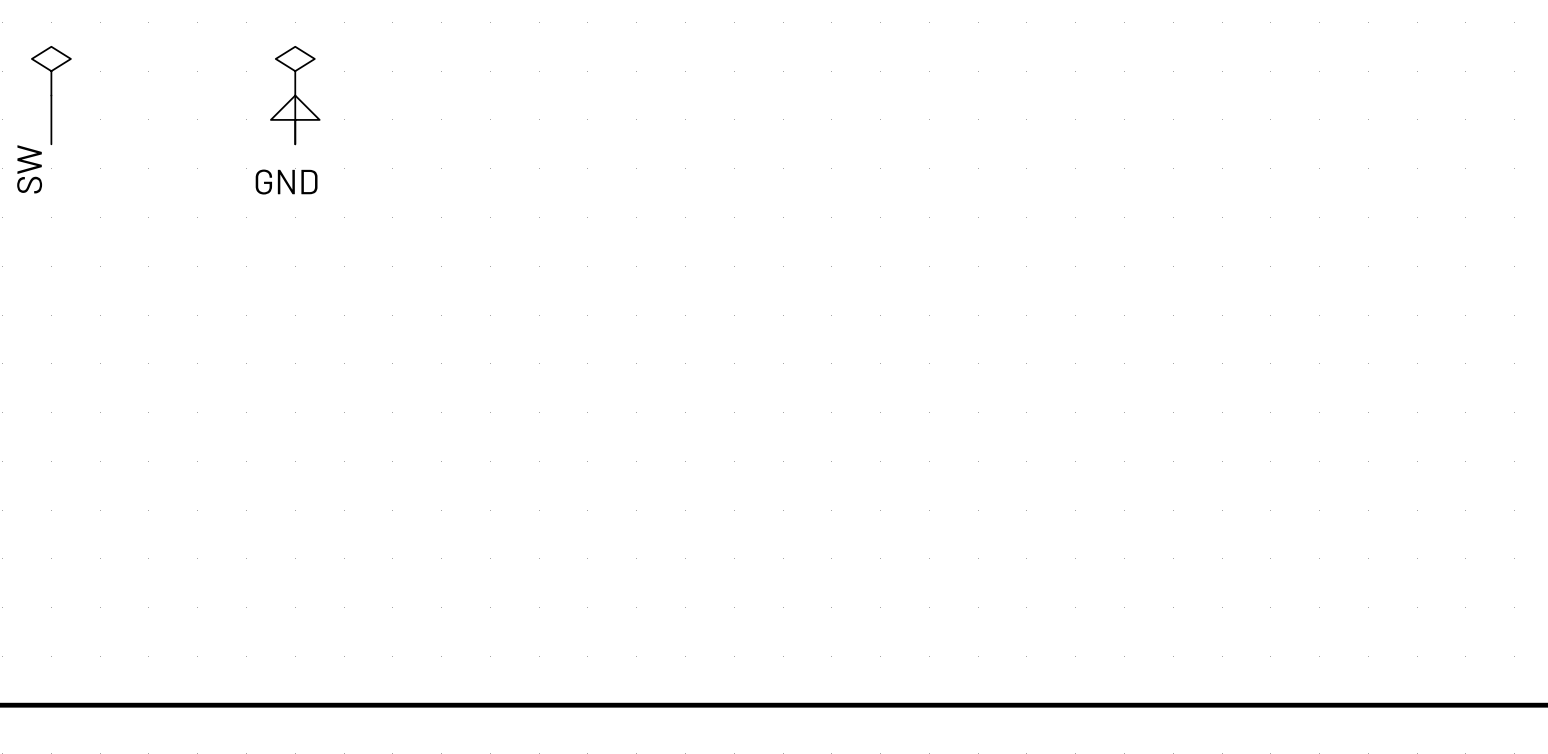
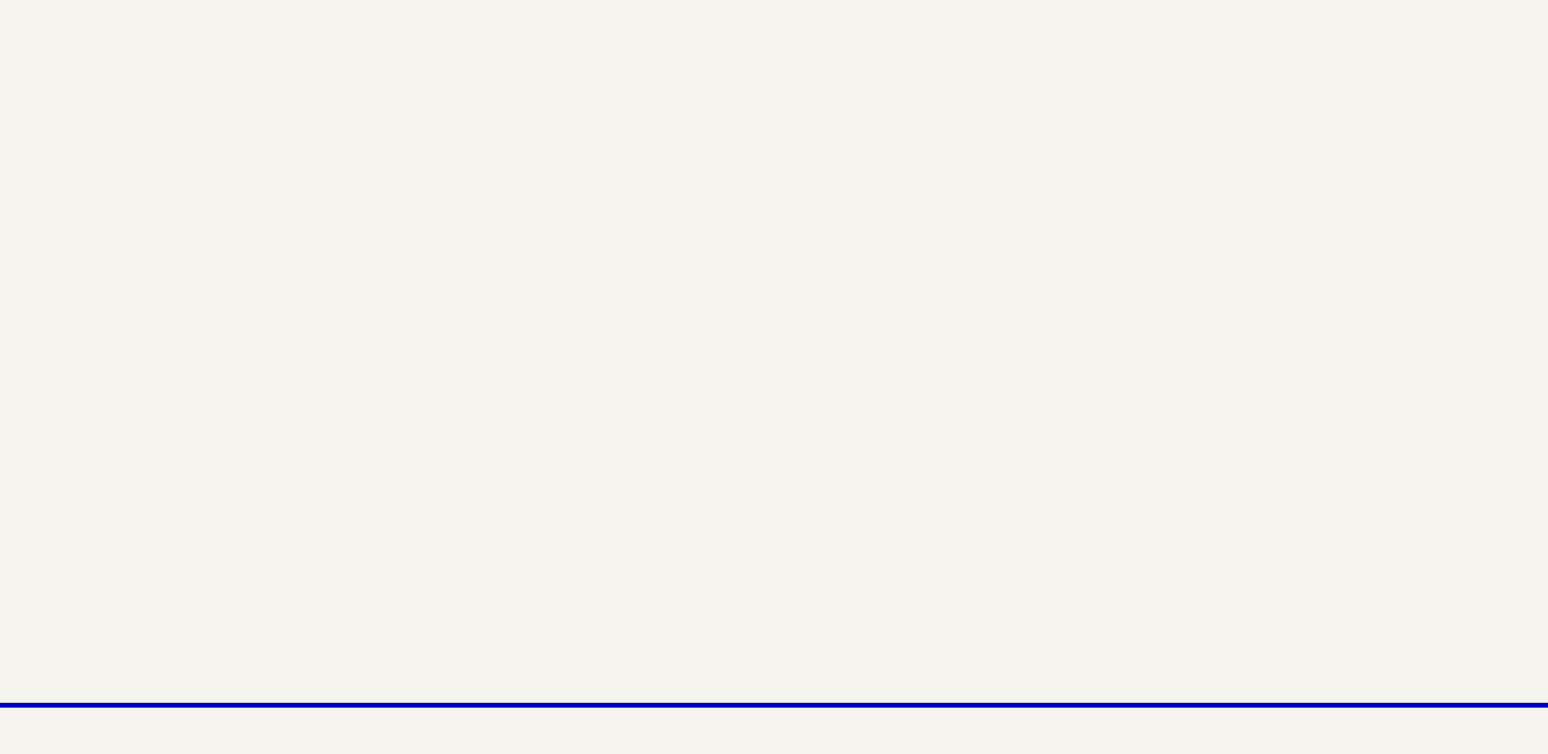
power symbol: (51, 71) -> none
power symbol: (295, 71) -> none
wire: (51, 95) (51, 144) -> none
wire: (295, 95) (295, 144) -> none
power symbol: GND (295, 119) -> none
label: SW (29, 169) -> none

